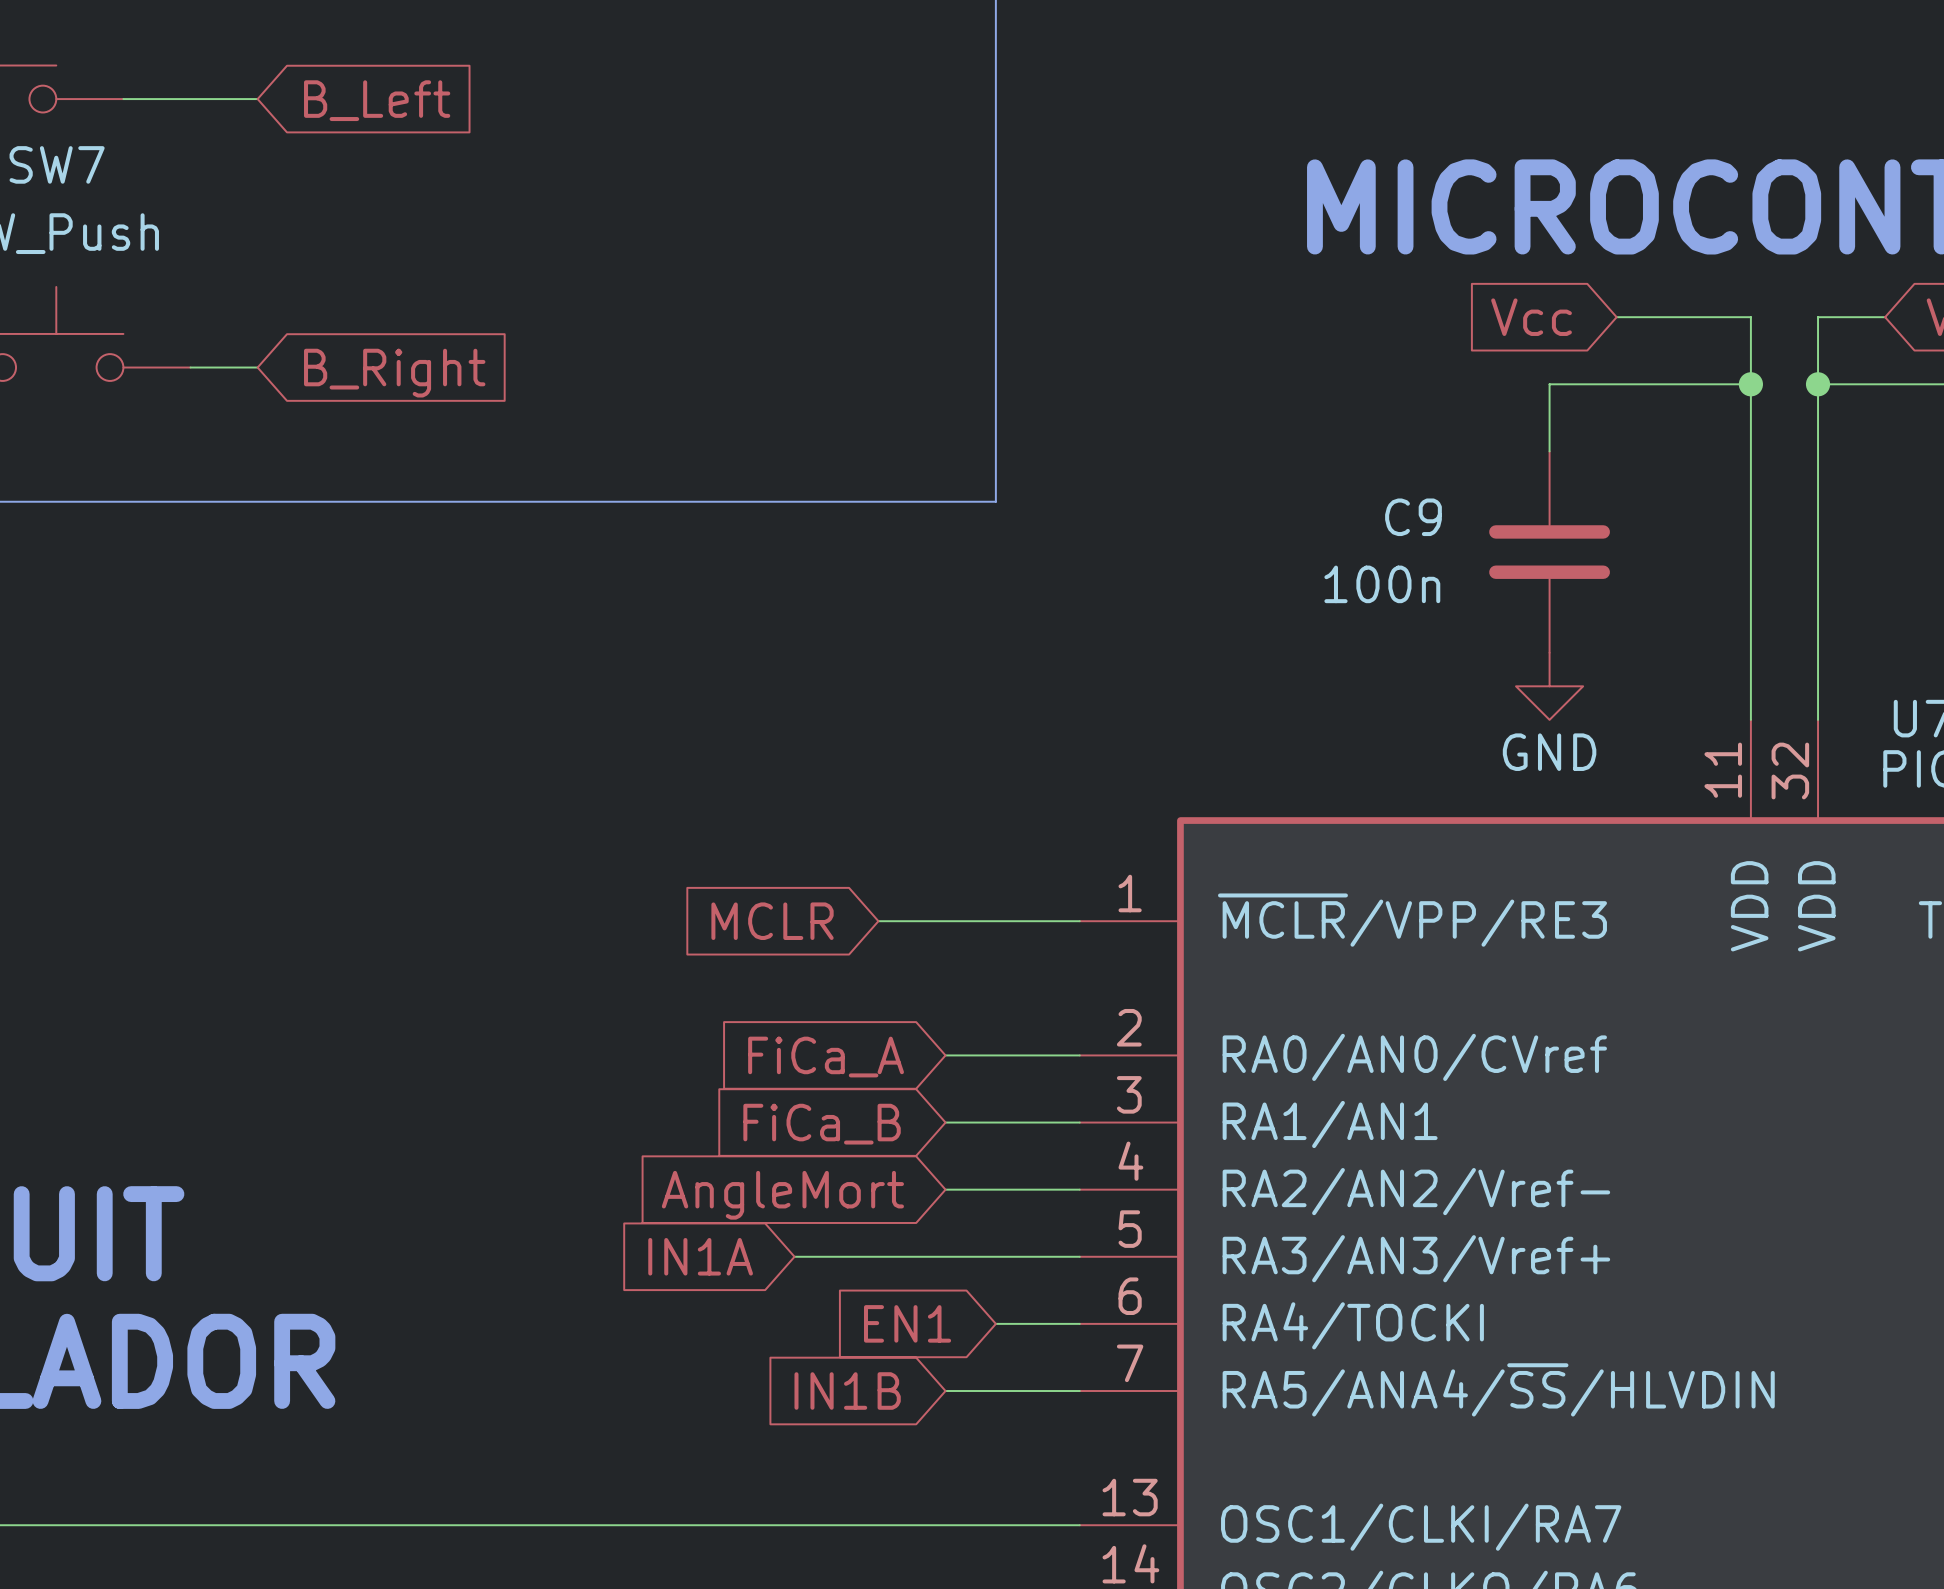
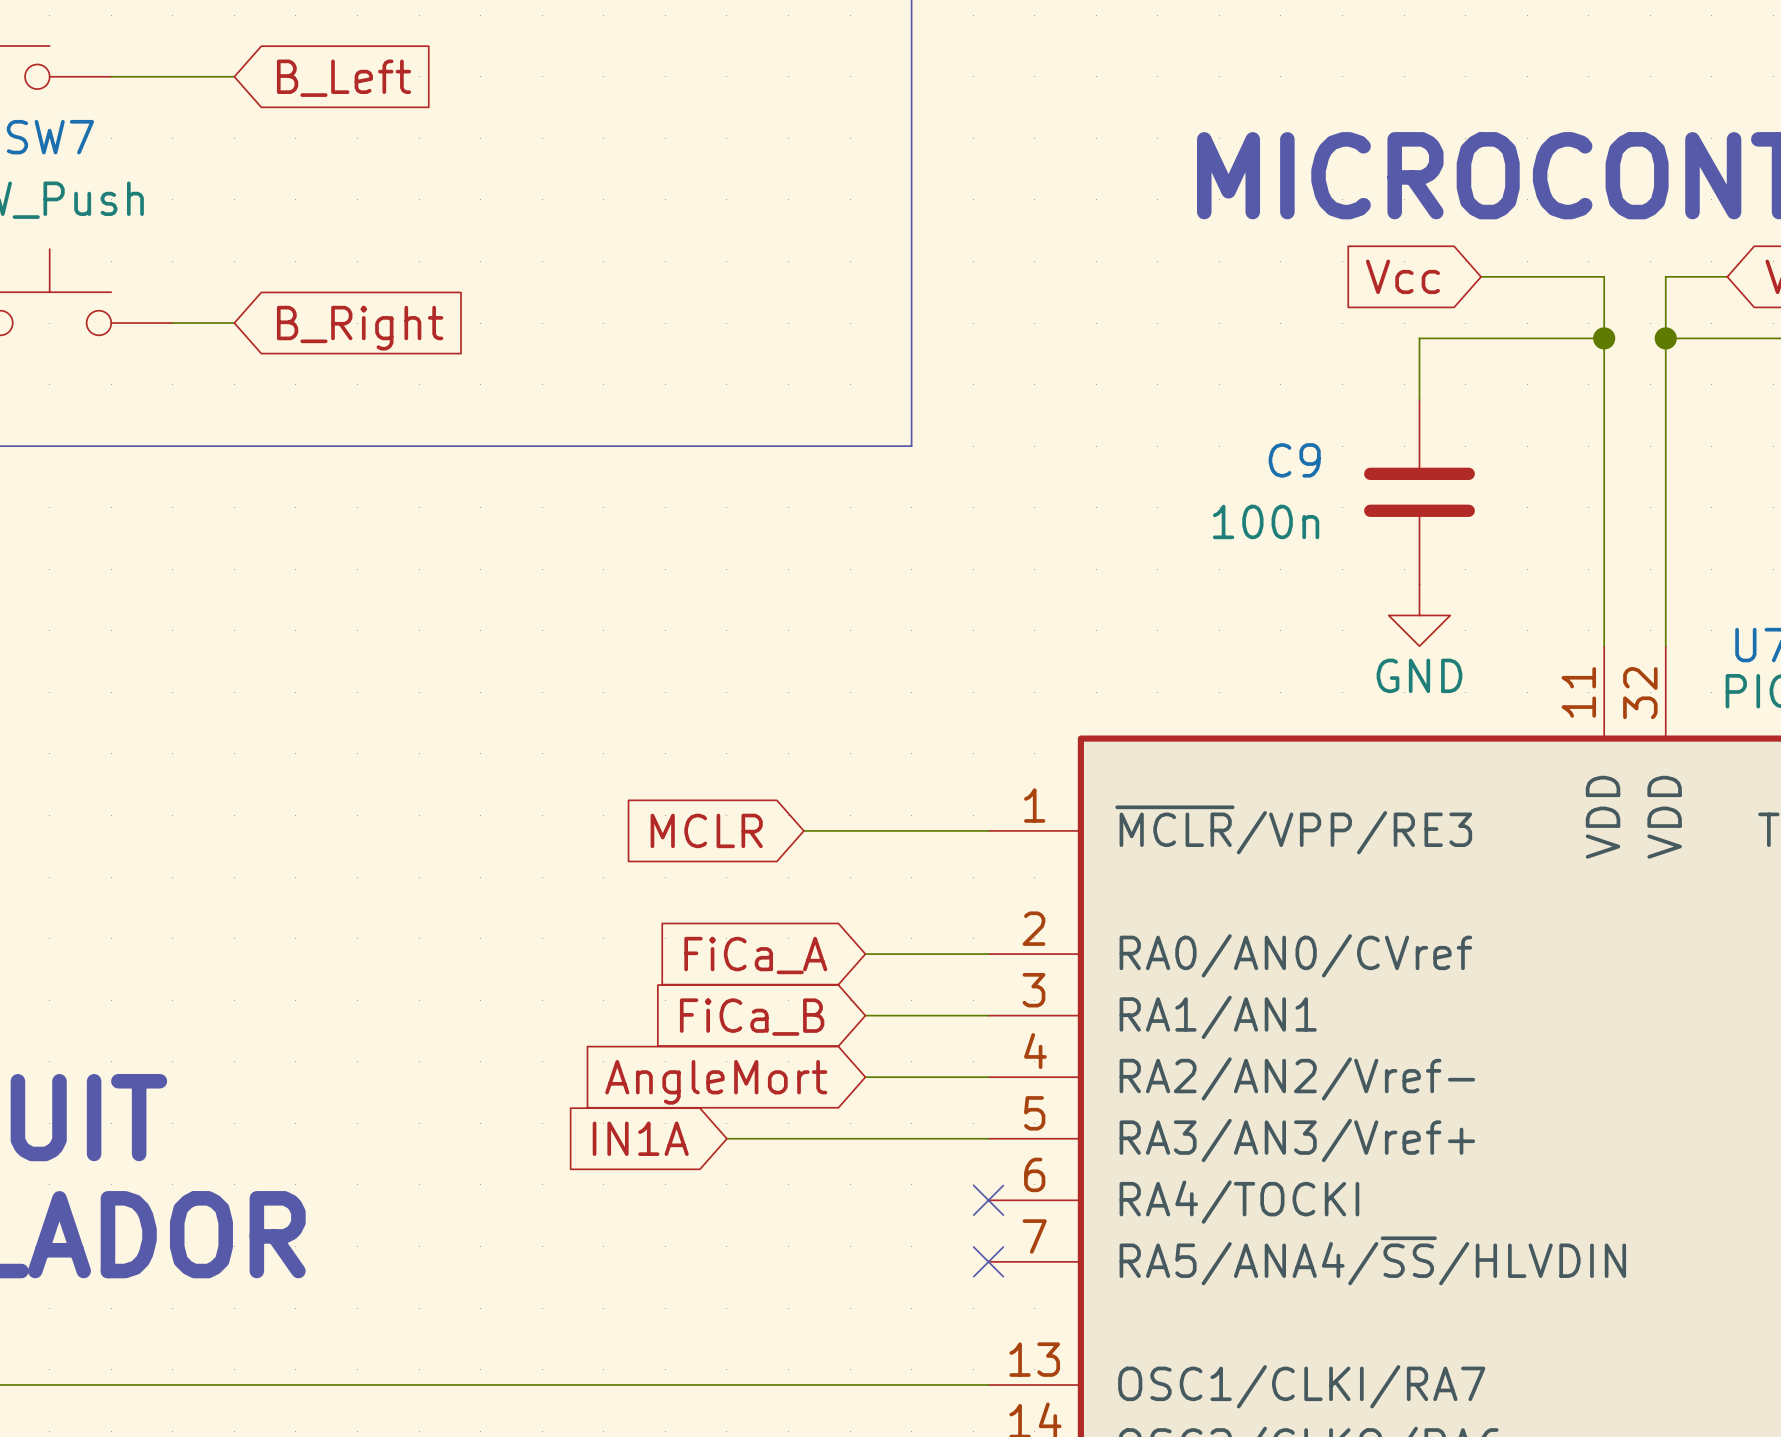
global label: EN1 (907, 1323) -> none
wire: (995, 1323) (1079, 1323) -> none
no-connect mark: none -> (988, 1200)
global label: IN1B (847, 1391) -> none
wire: (945, 1391) (1079, 1391) -> none
no-connect mark: none -> (988, 1261)

